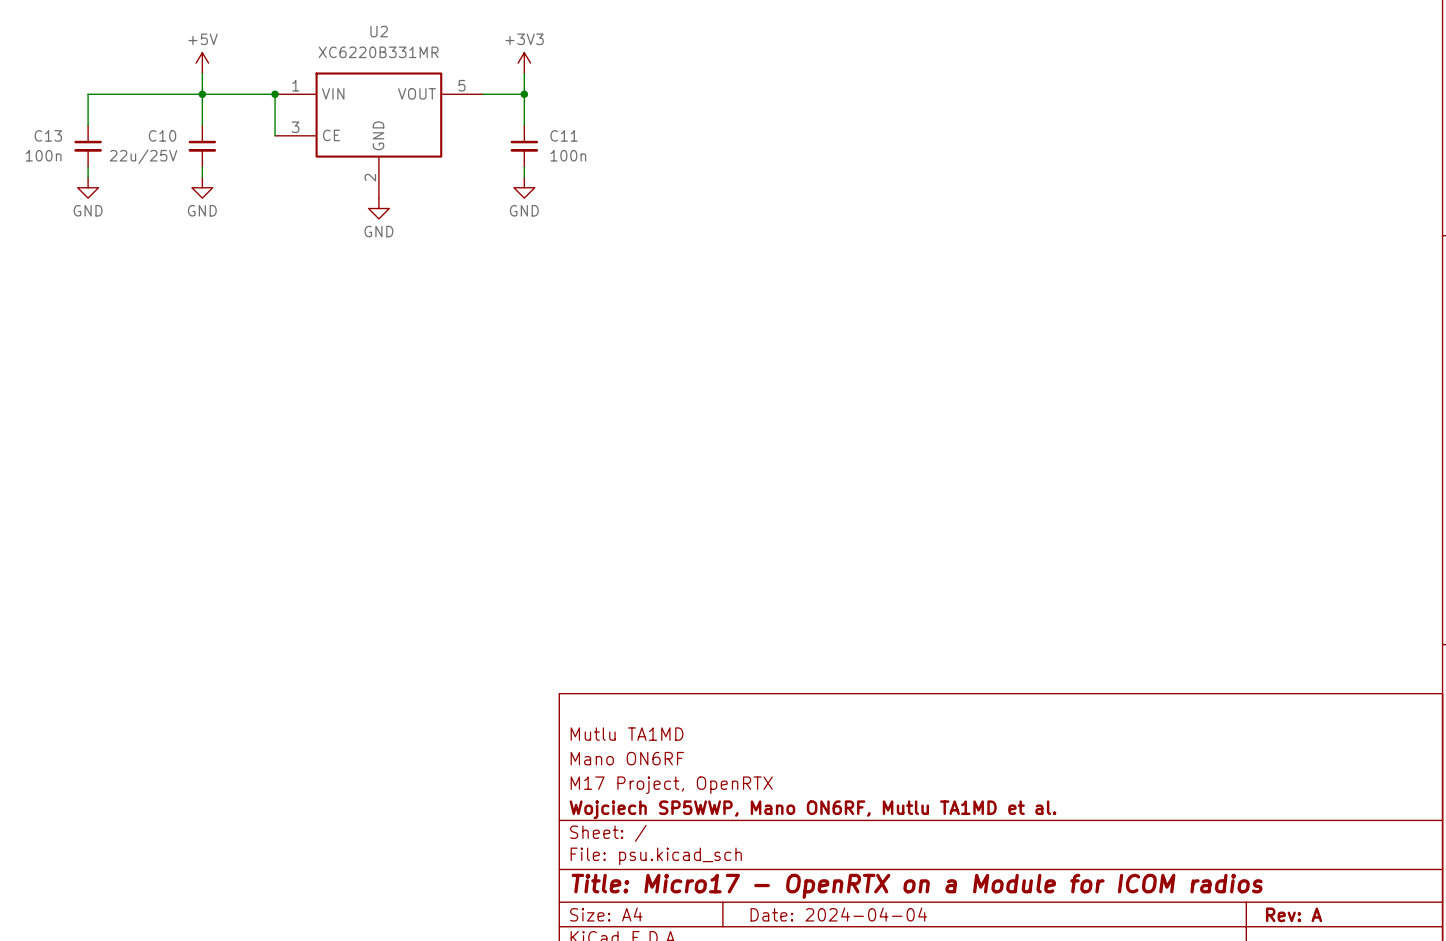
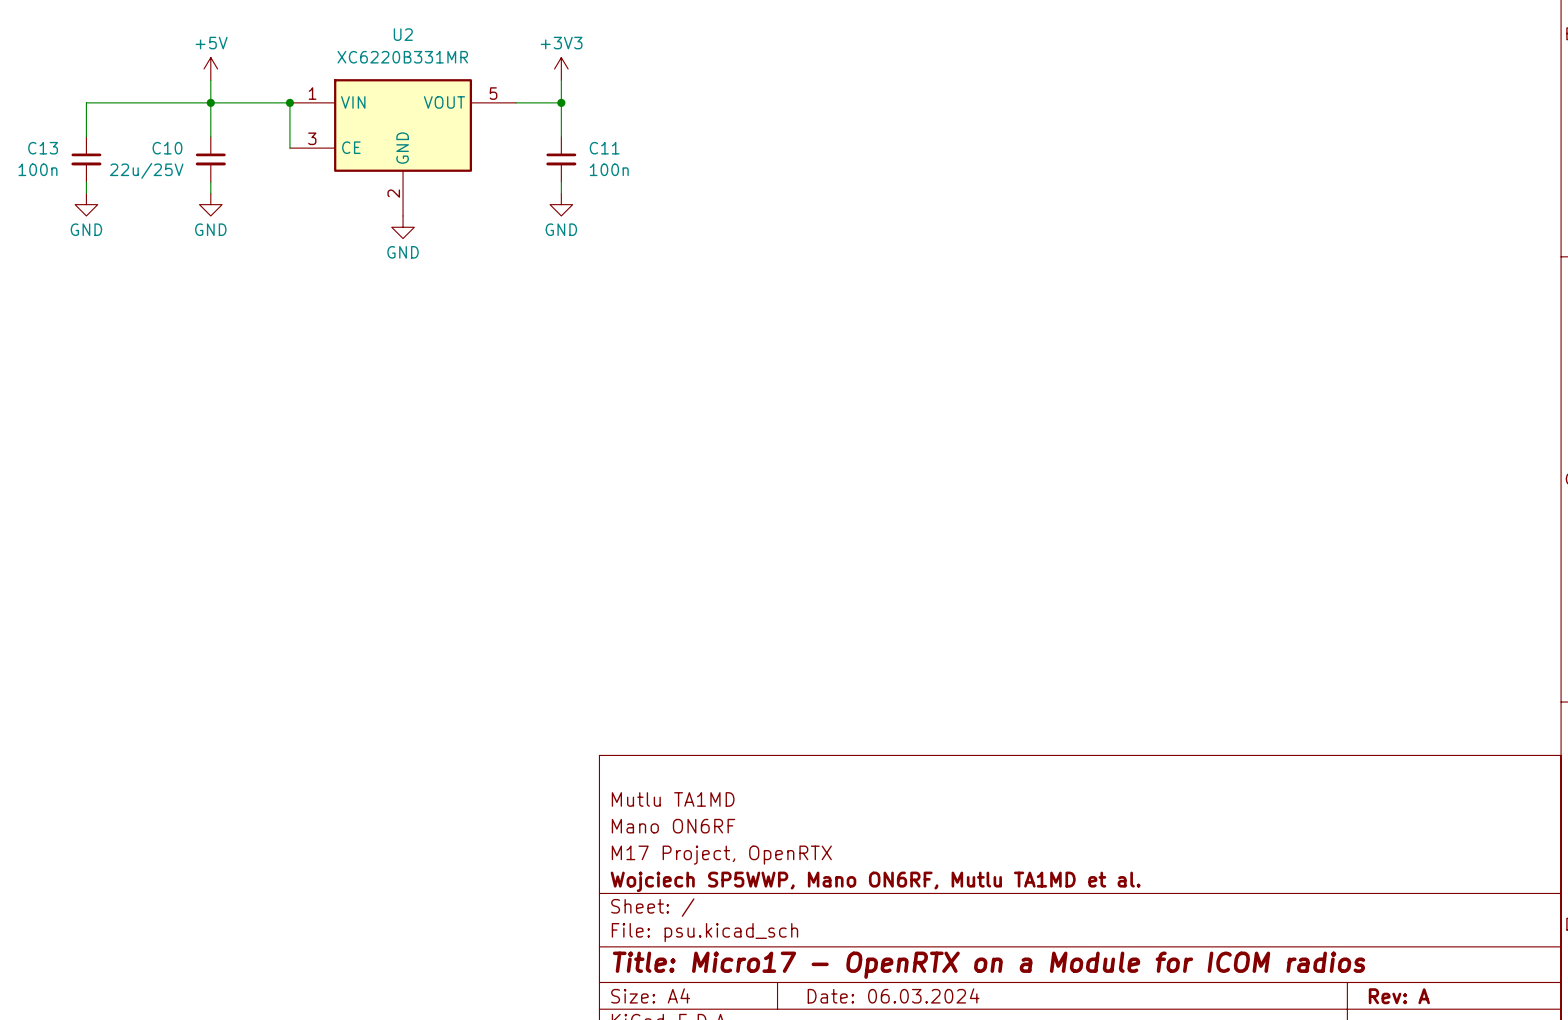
title block: Date: 2024-04-04 (838, 914) -> Date: 06.03.2024 (893, 995)

